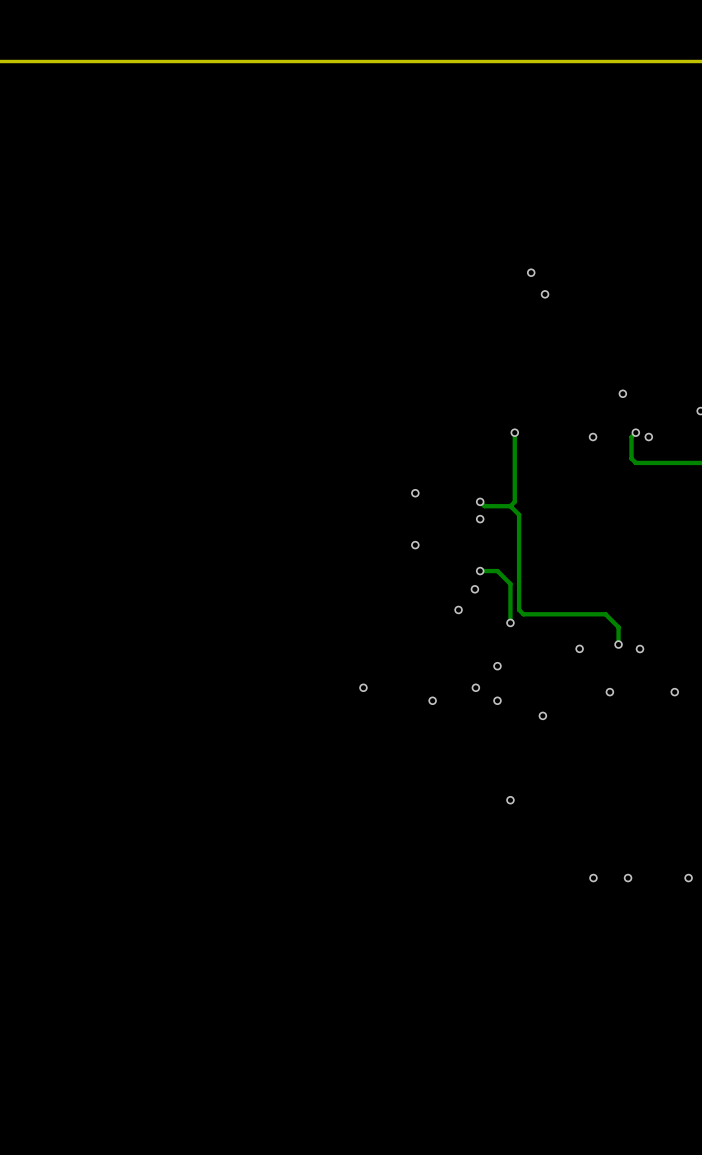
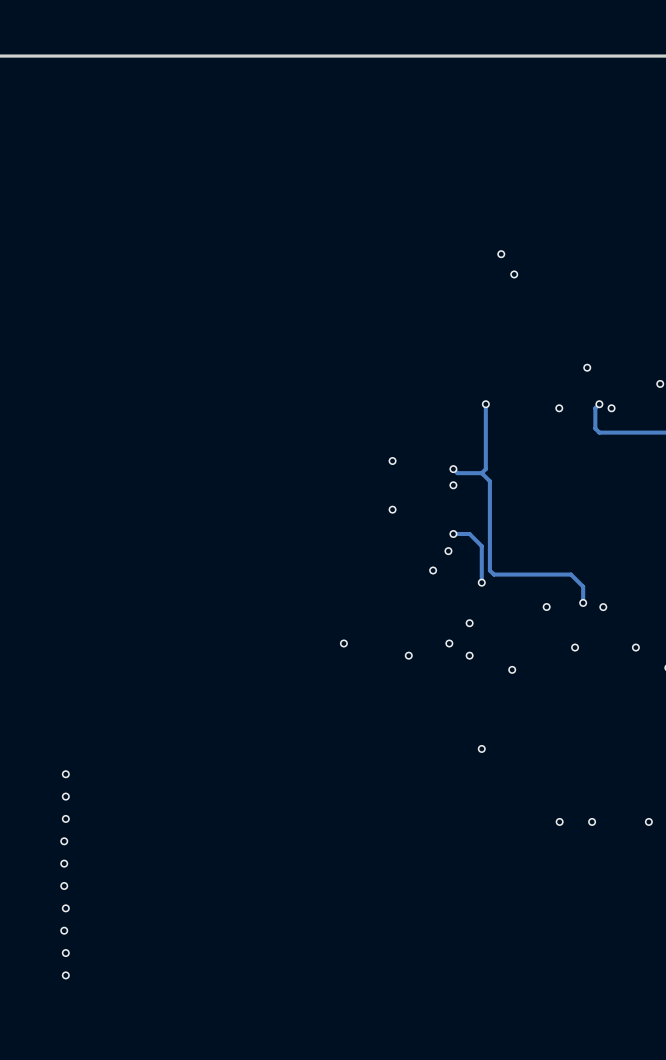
via: none -> (65, 774)
via: none -> (65, 796)
via: none -> (65, 818)
via: none -> (64, 841)
via: none -> (64, 863)
via: none -> (64, 885)
via: none -> (65, 908)
via: none -> (64, 930)
via: none -> (65, 953)
via: none -> (65, 975)

